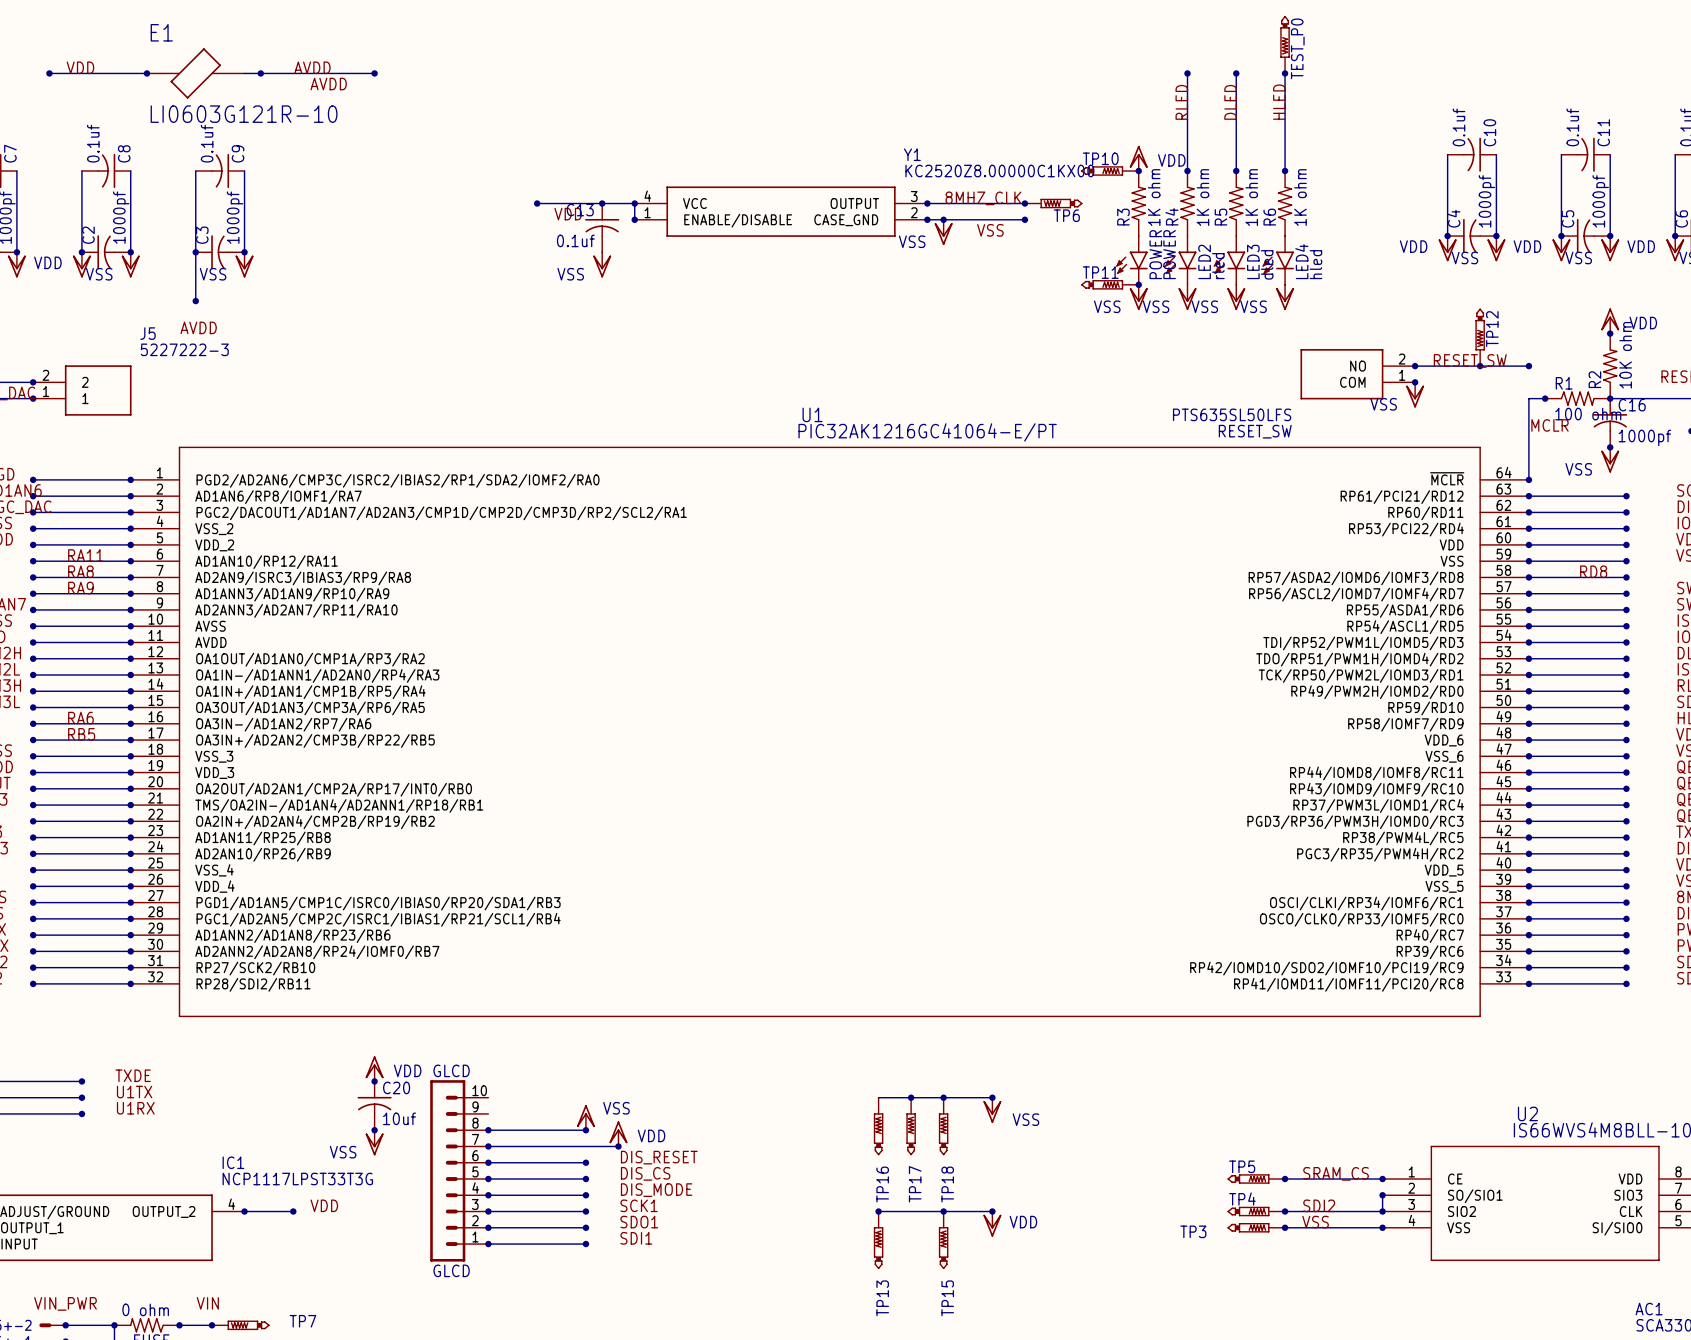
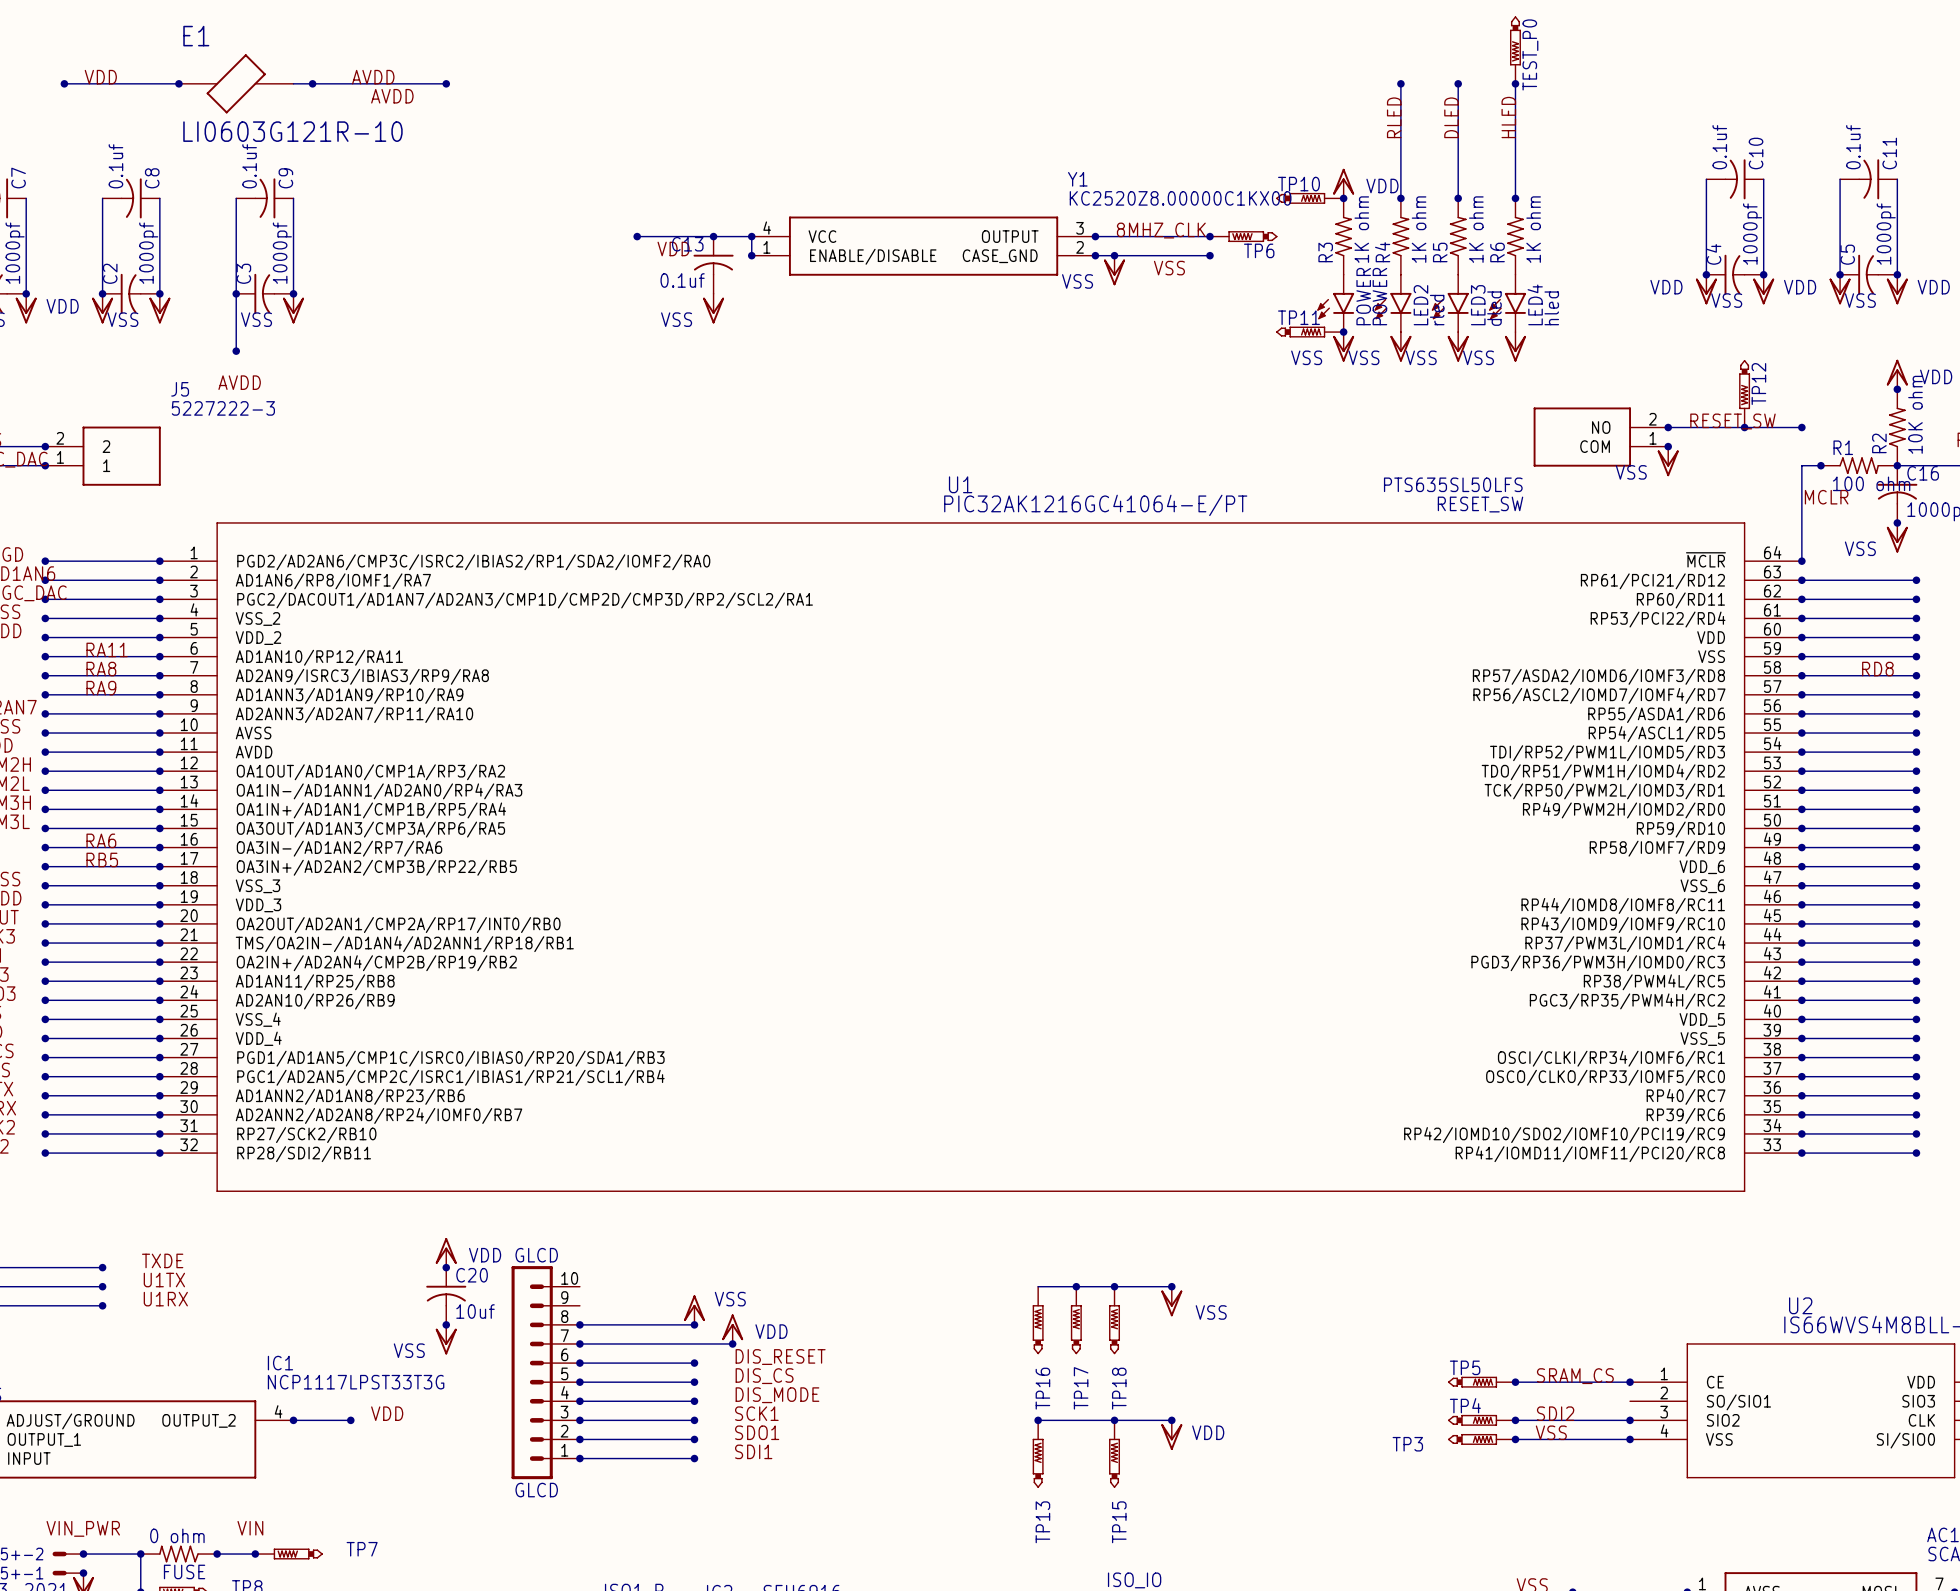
wire: (1382, 1195) (1382, 1211) -> none
junction: (1382, 1195) -> none

